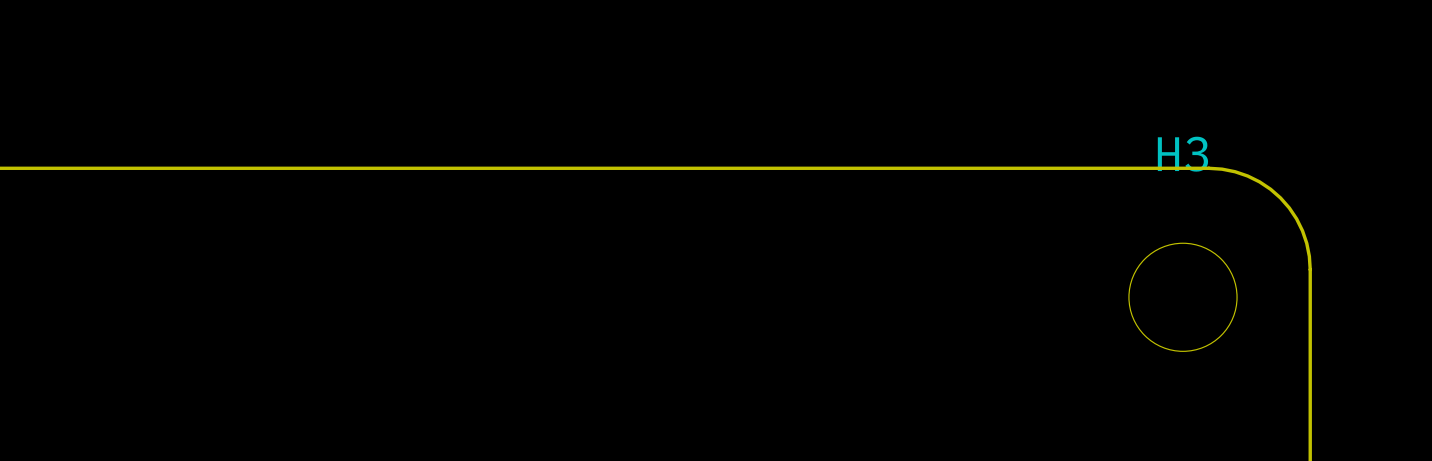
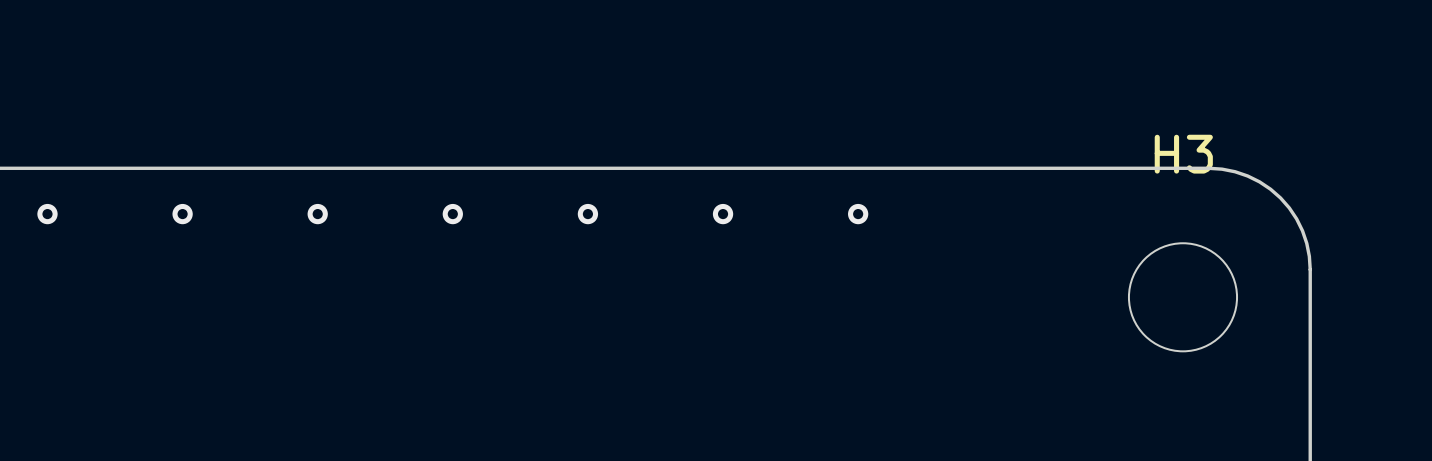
via: none -> (47, 214)
via: none -> (182, 214)
via: none -> (317, 214)
via: none -> (452, 214)
via: none -> (587, 214)
via: none -> (723, 214)
via: none -> (858, 214)

